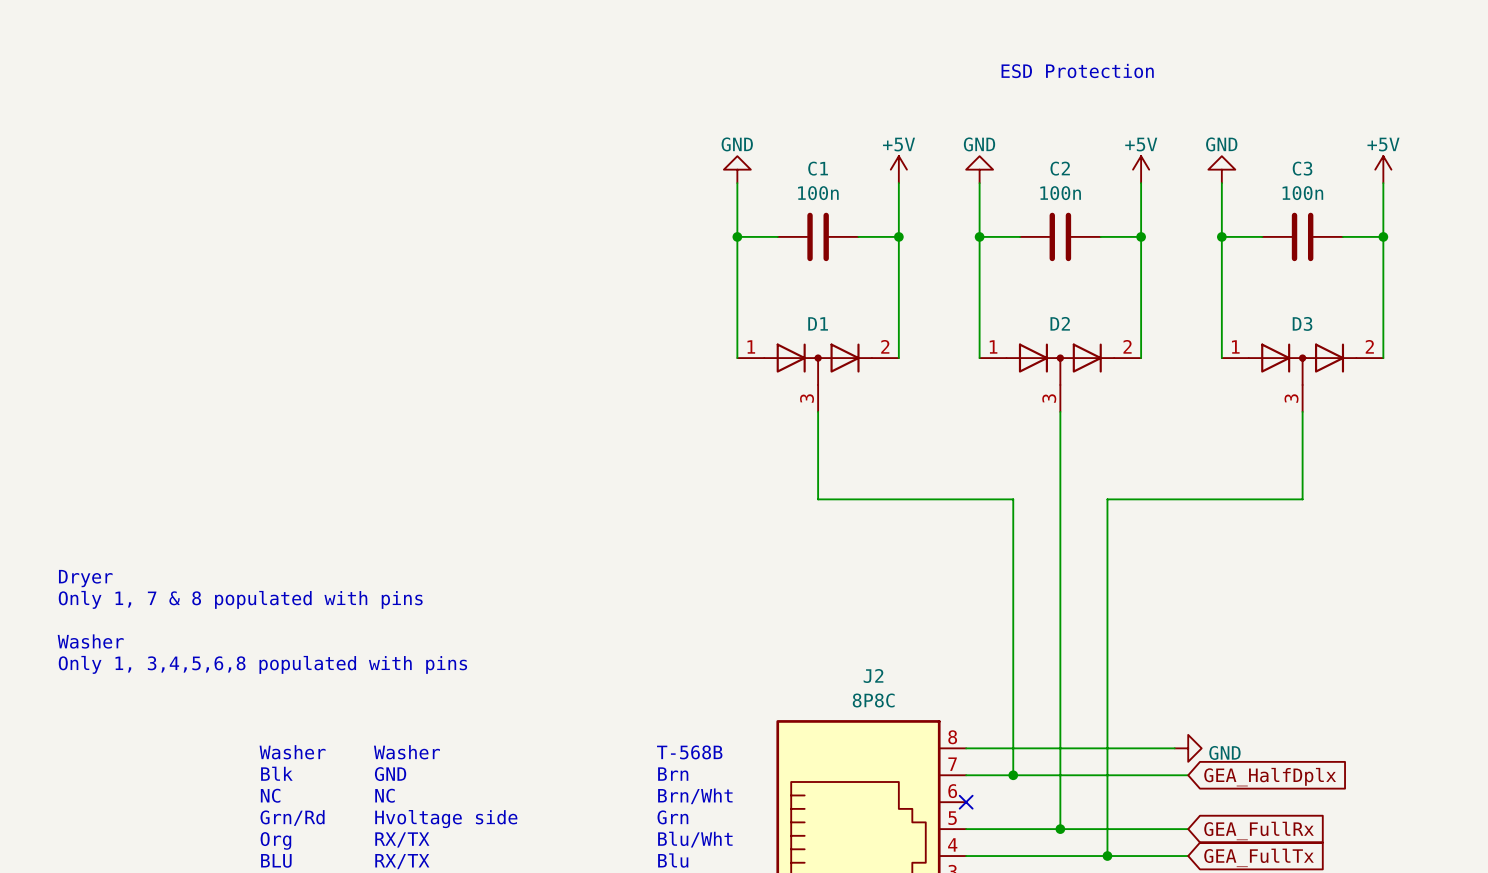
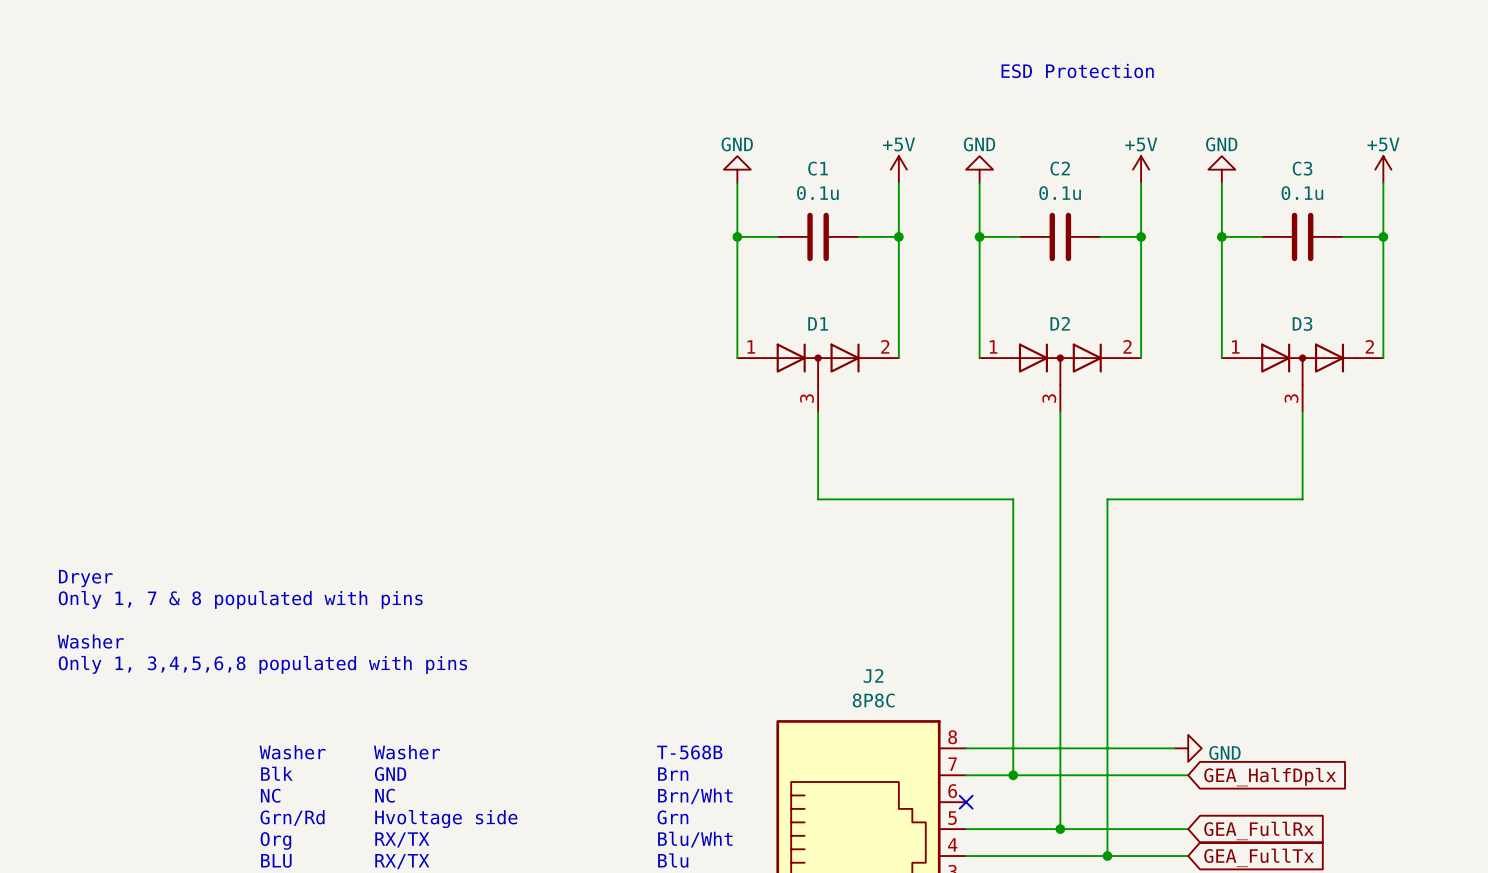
C1 value: 100n (818, 193) -> 0.1u (817, 193)
C2 value: 100n (1060, 193) -> 0.1u (1060, 193)
C3 value: 100n (1302, 193) -> 0.1u (1302, 193)

